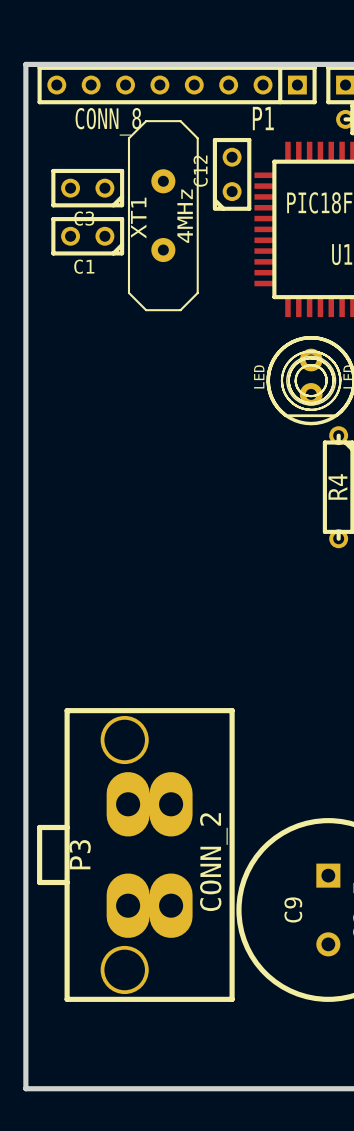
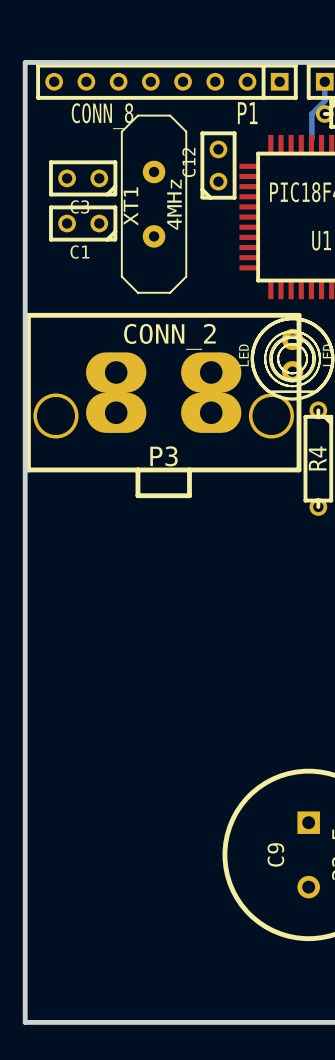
bottom track: none -> (324, 81) (324, 101) (311, 113) (311, 139)
P3 footprint: [37, 708, 235, 1002] -> [26, 312, 302, 499]
P3 name position: P3 (80, 854) -> P3 (164, 456)
P3 value position: CONN_2 (213, 862) -> CONN_2 (169, 336)

